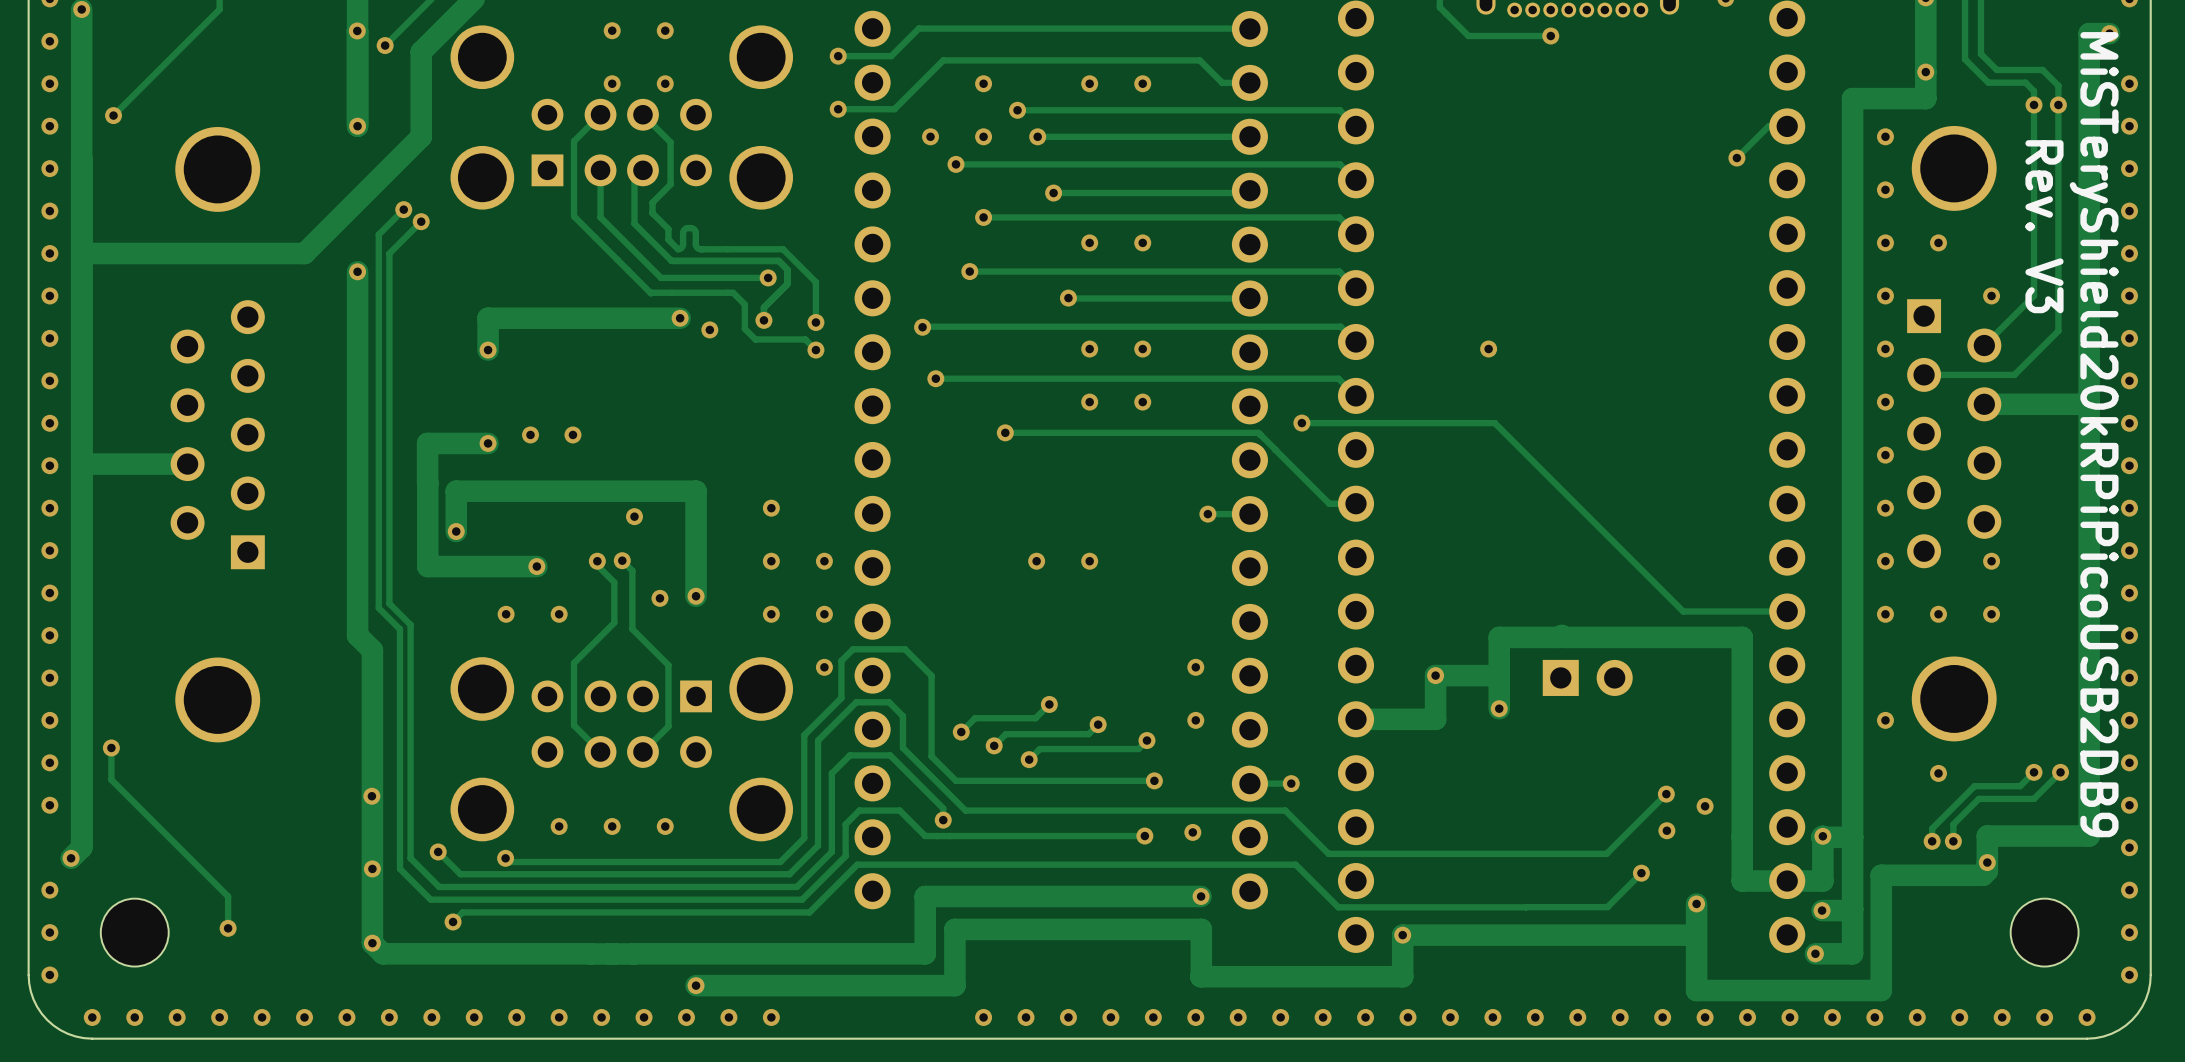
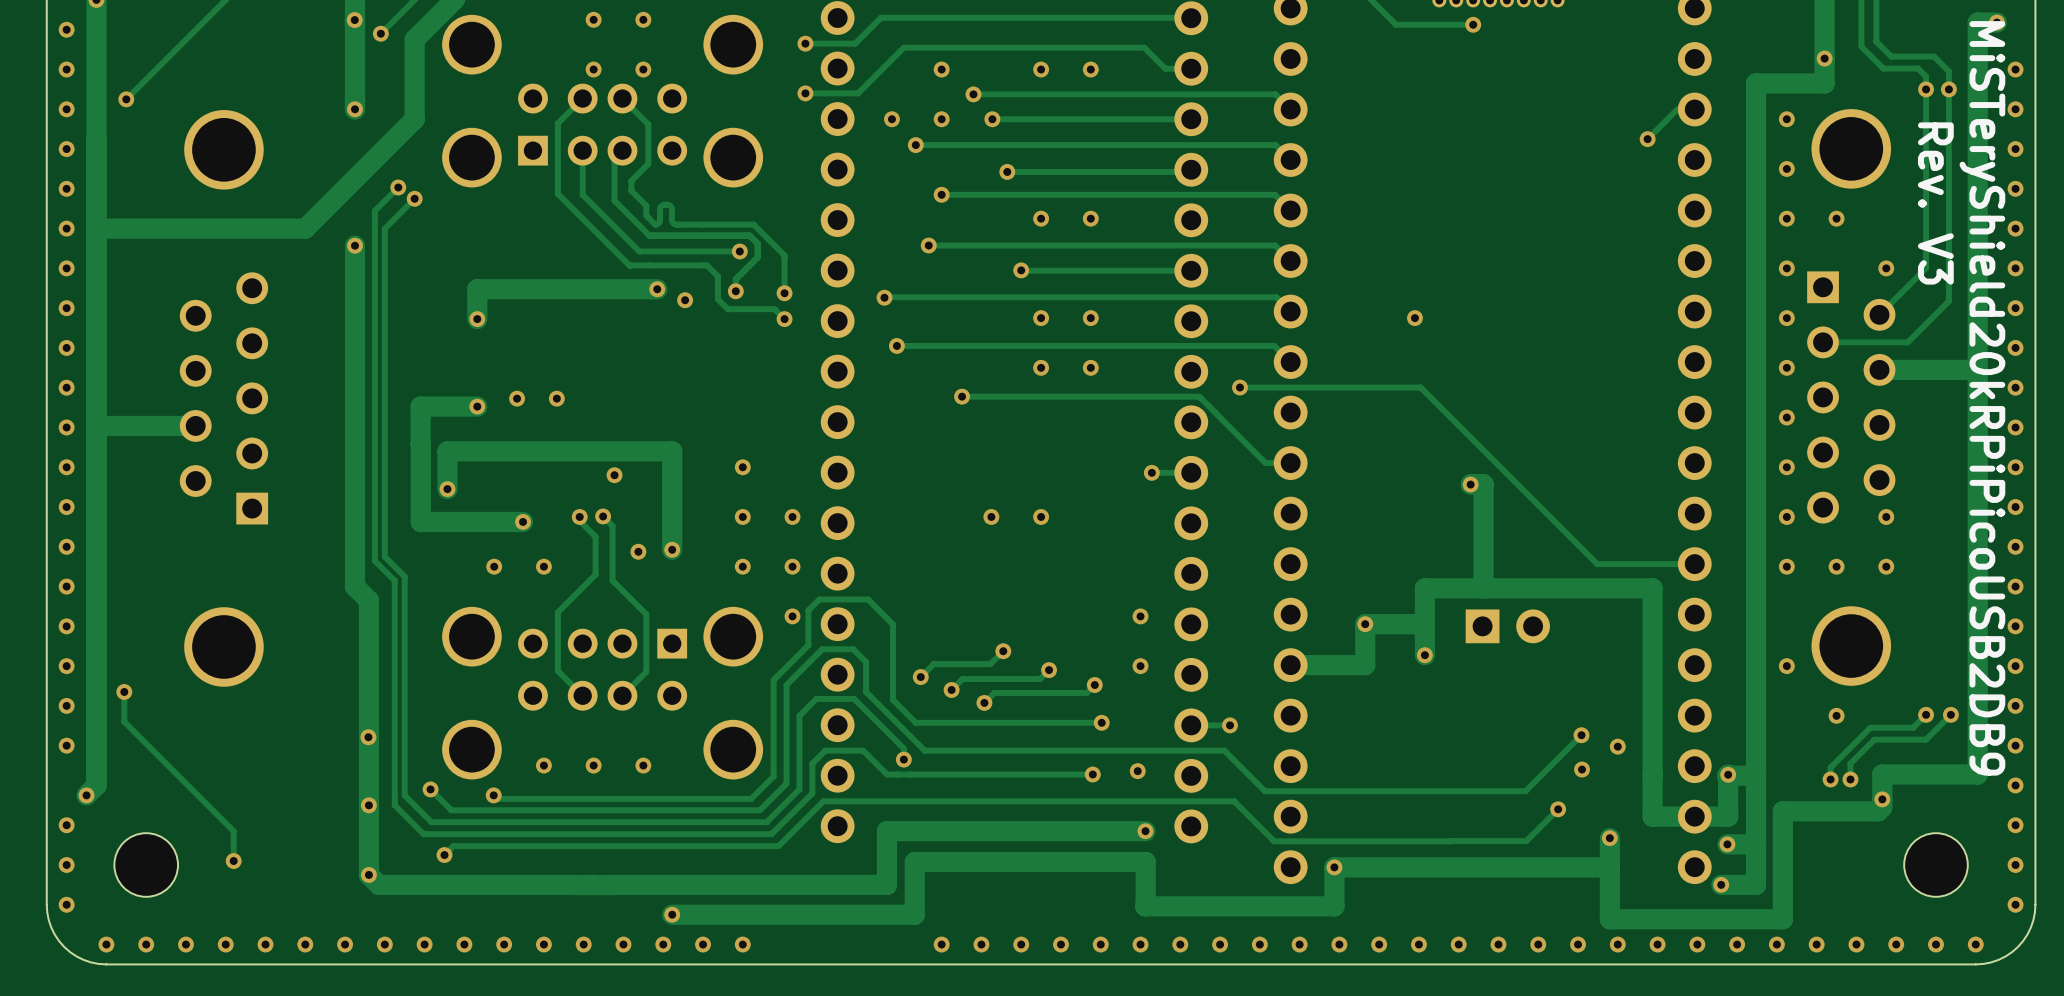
track: none -> (1470, 484) (1483, 484) (1483, 586)
via: none -> (1470, 484)

